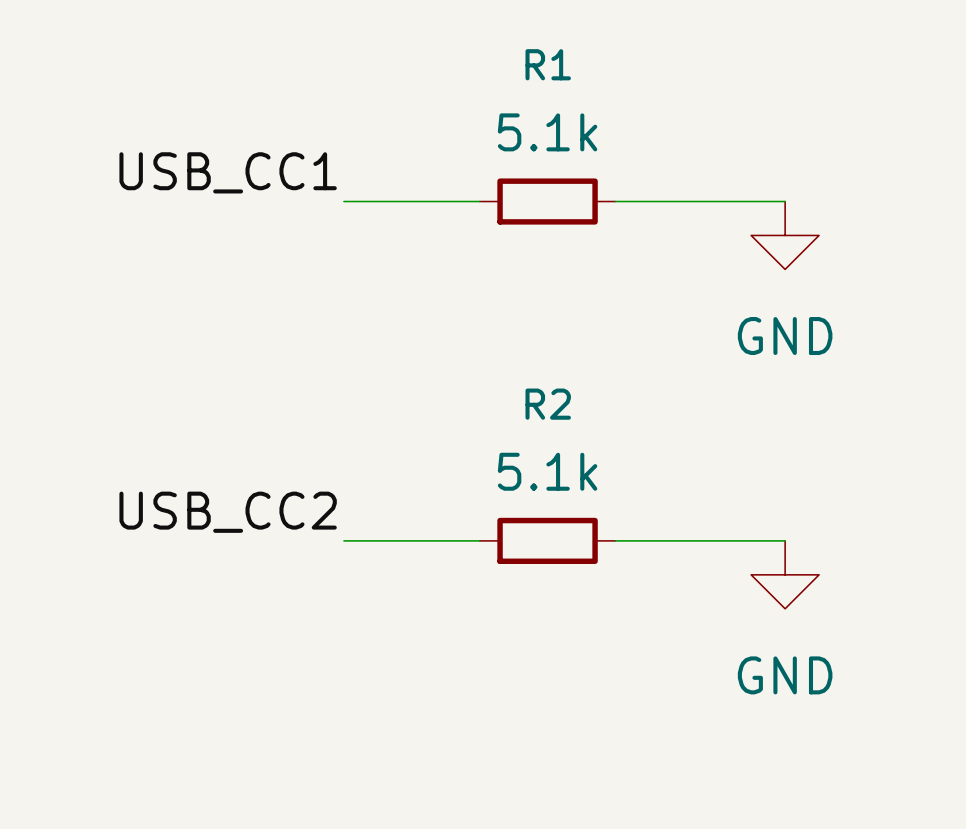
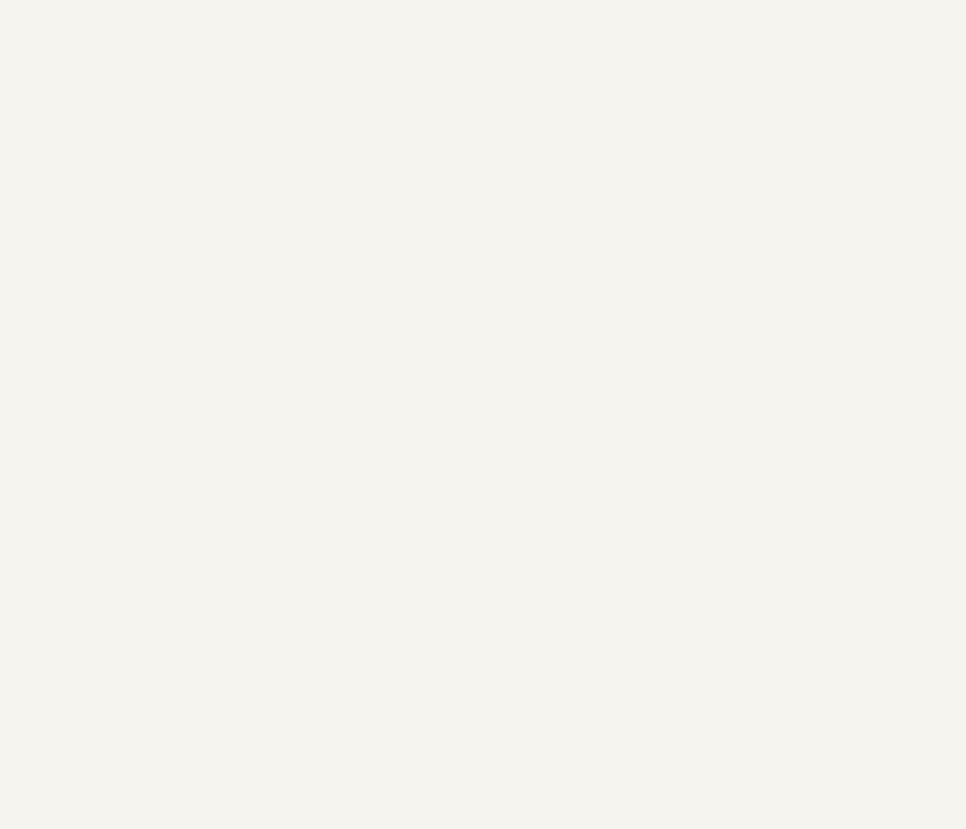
label: USB_CC1 (228, 172) -> none
wire: (343, 201) (479, 201) -> none
R1: 5.1k (547, 201) -> none
wire: (615, 201) (785, 201) -> none
power symbol: GND (785, 235) -> none
label: USB_CC2 (228, 512) -> none
wire: (343, 540) (479, 540) -> none
R2: 5.1k (547, 540) -> none
wire: (615, 540) (785, 540) -> none
power symbol: GND (785, 574) -> none

